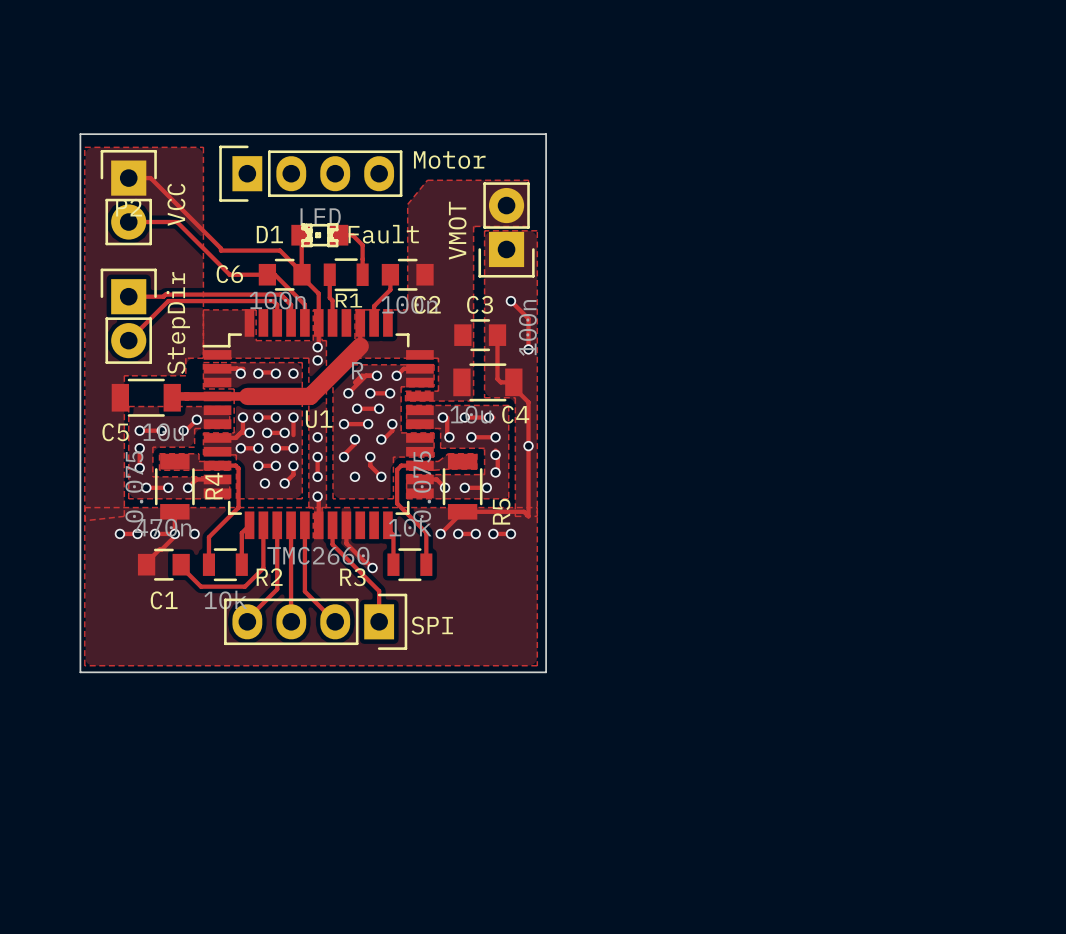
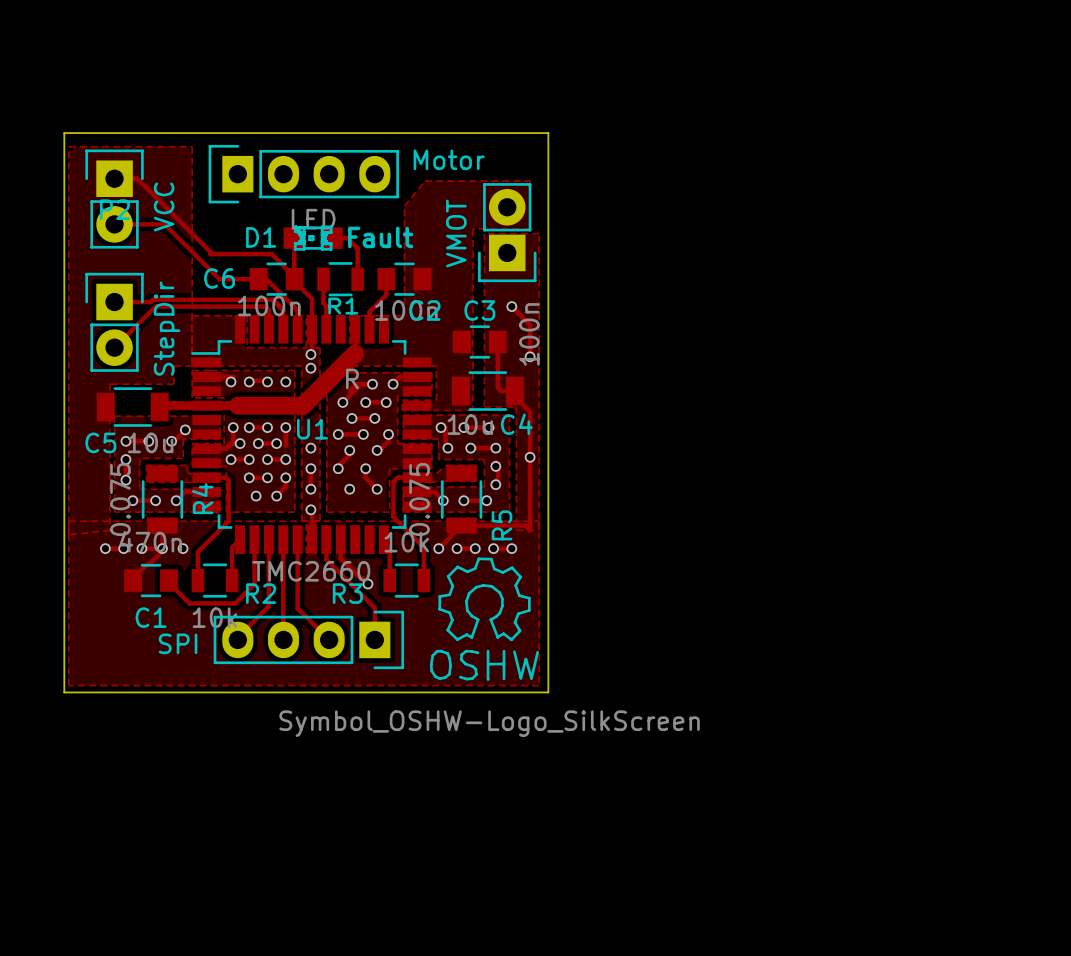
drawing: none -> [429, 557, 539, 681]
part value position: SPI (432, 625) -> SPI (178, 643)

